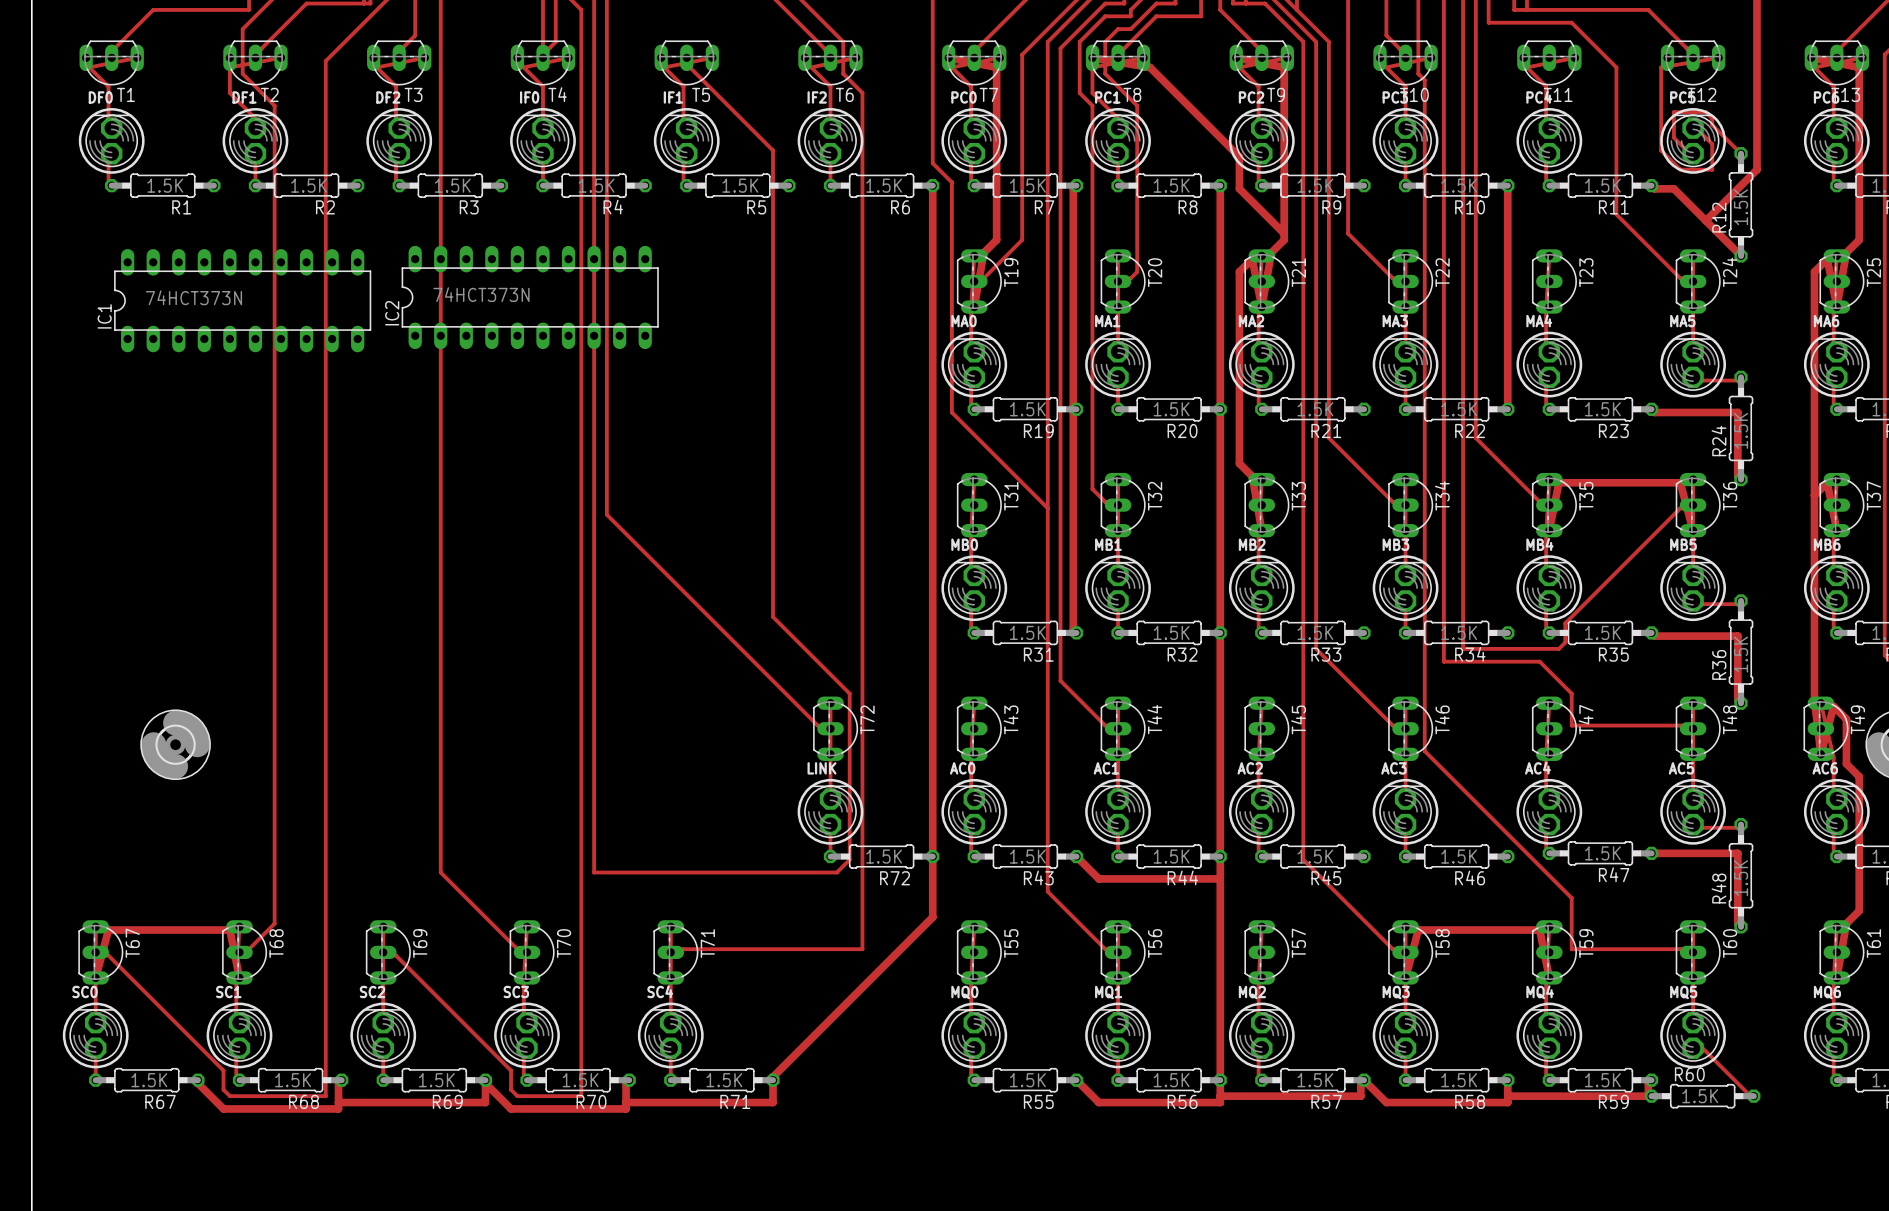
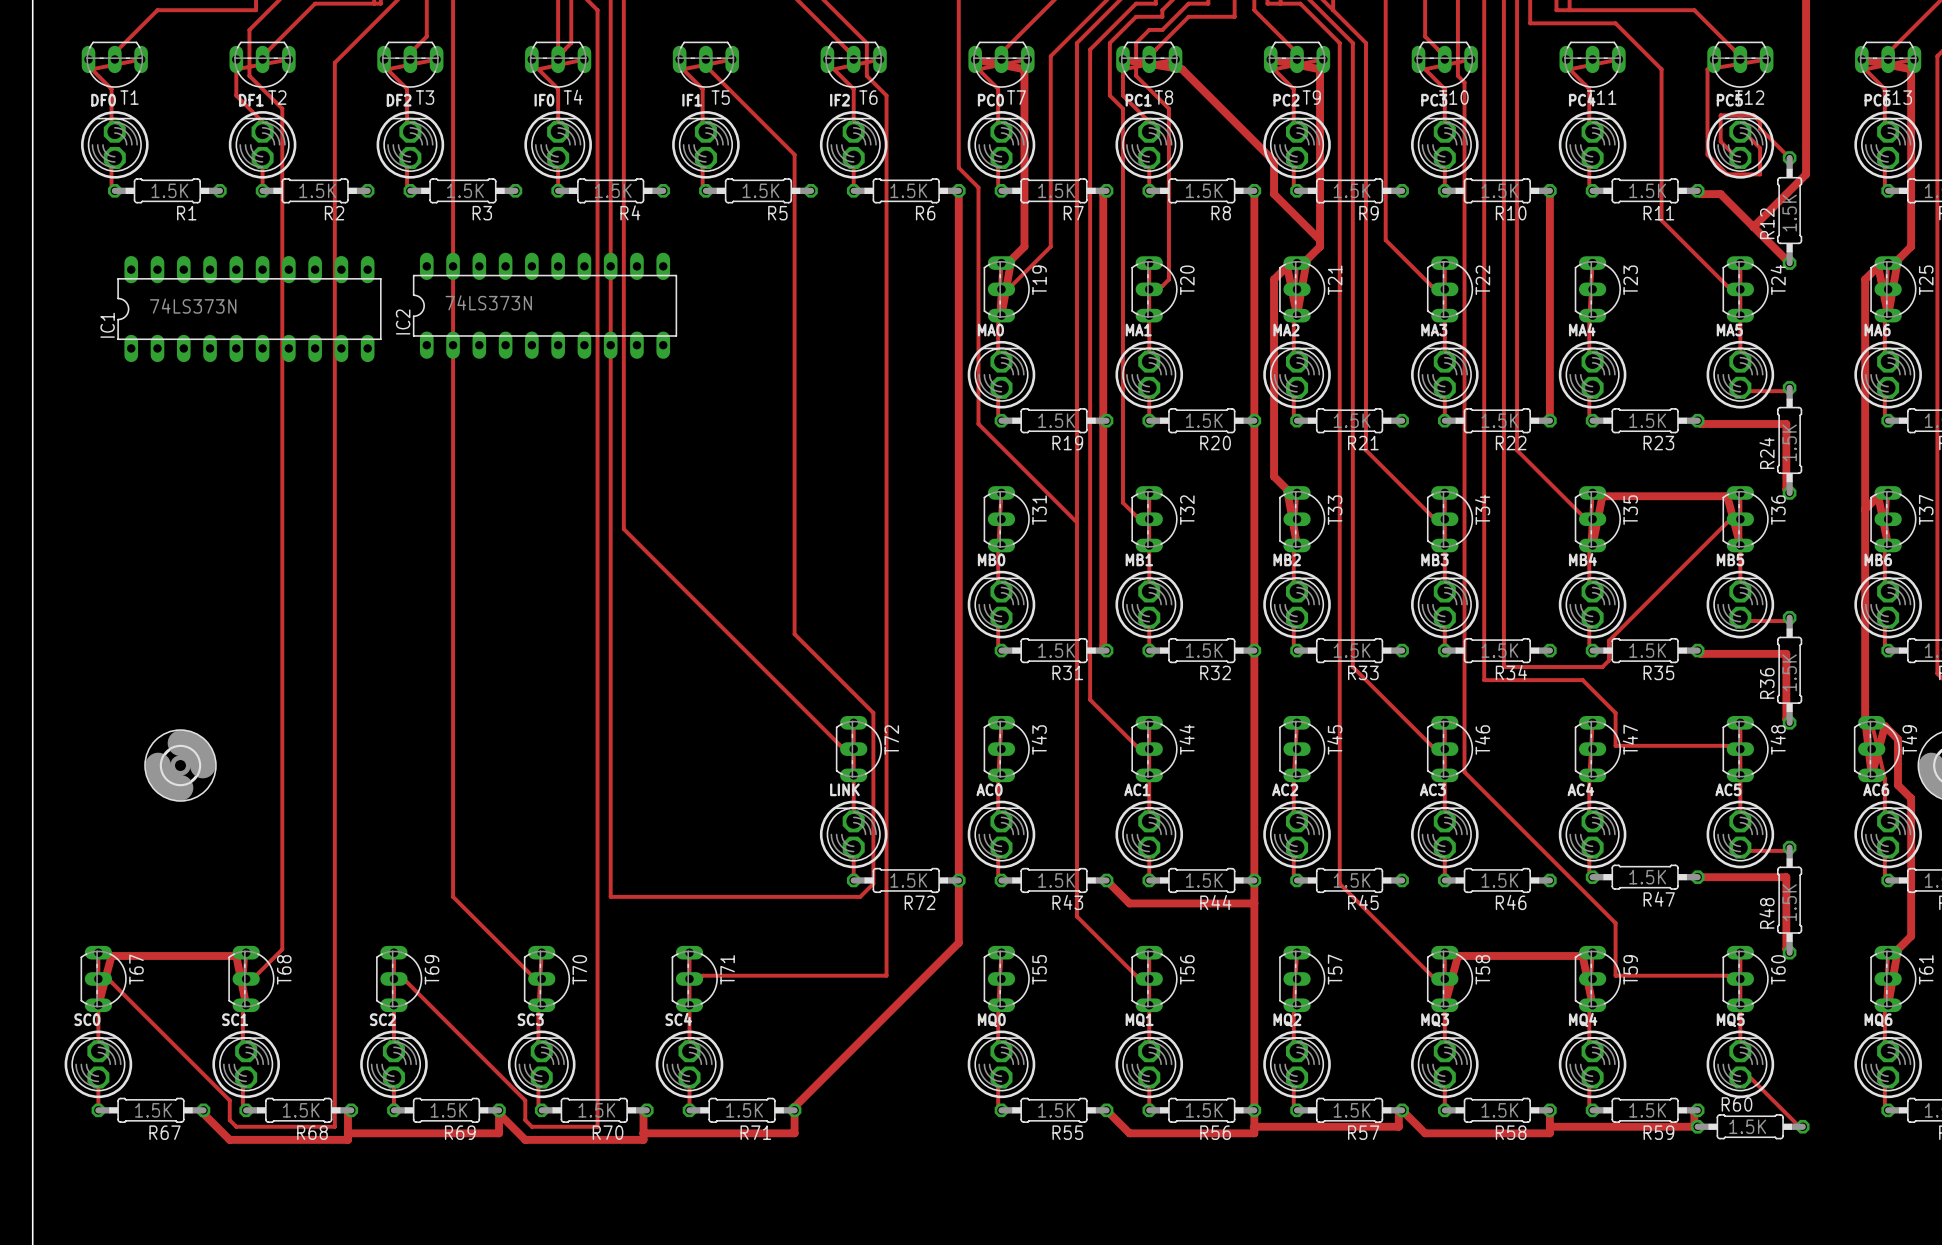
IC2 value: 74HCT373N (481, 294) -> 74LS373N (488, 302)
IC1 value: 74HCT373N (193, 297) -> 74LS373N (193, 306)

